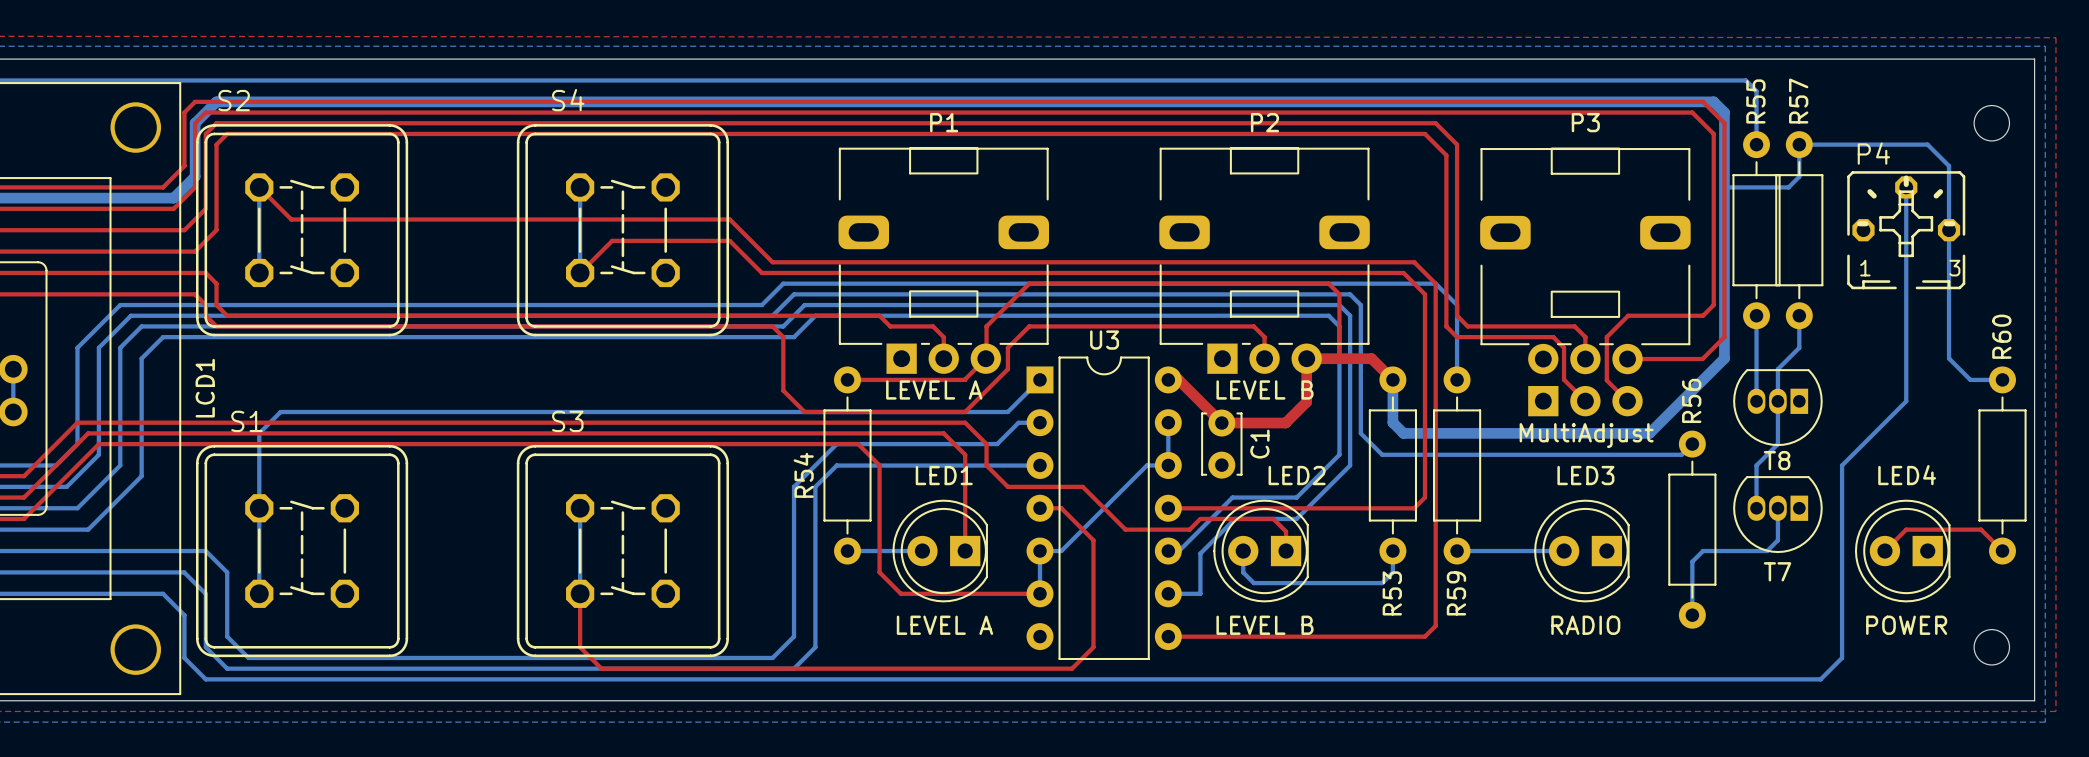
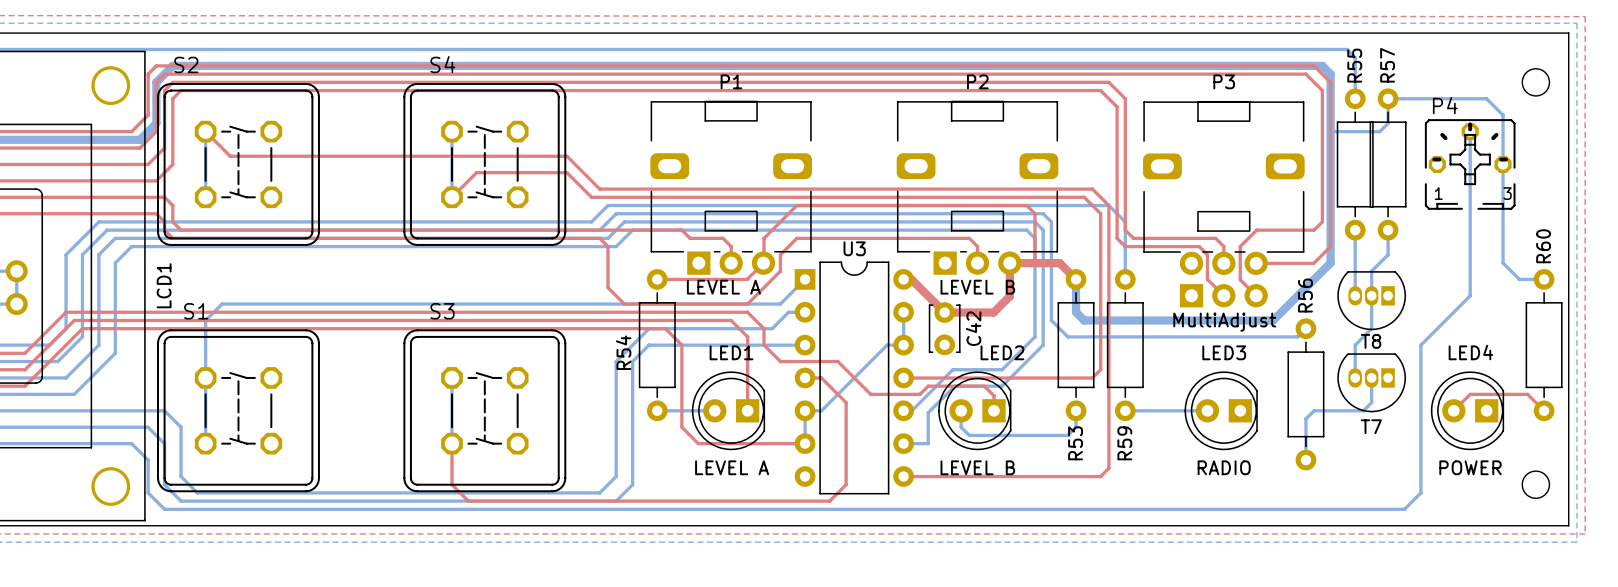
C1 name: C1 (1259, 444) -> C42 (973, 328)

